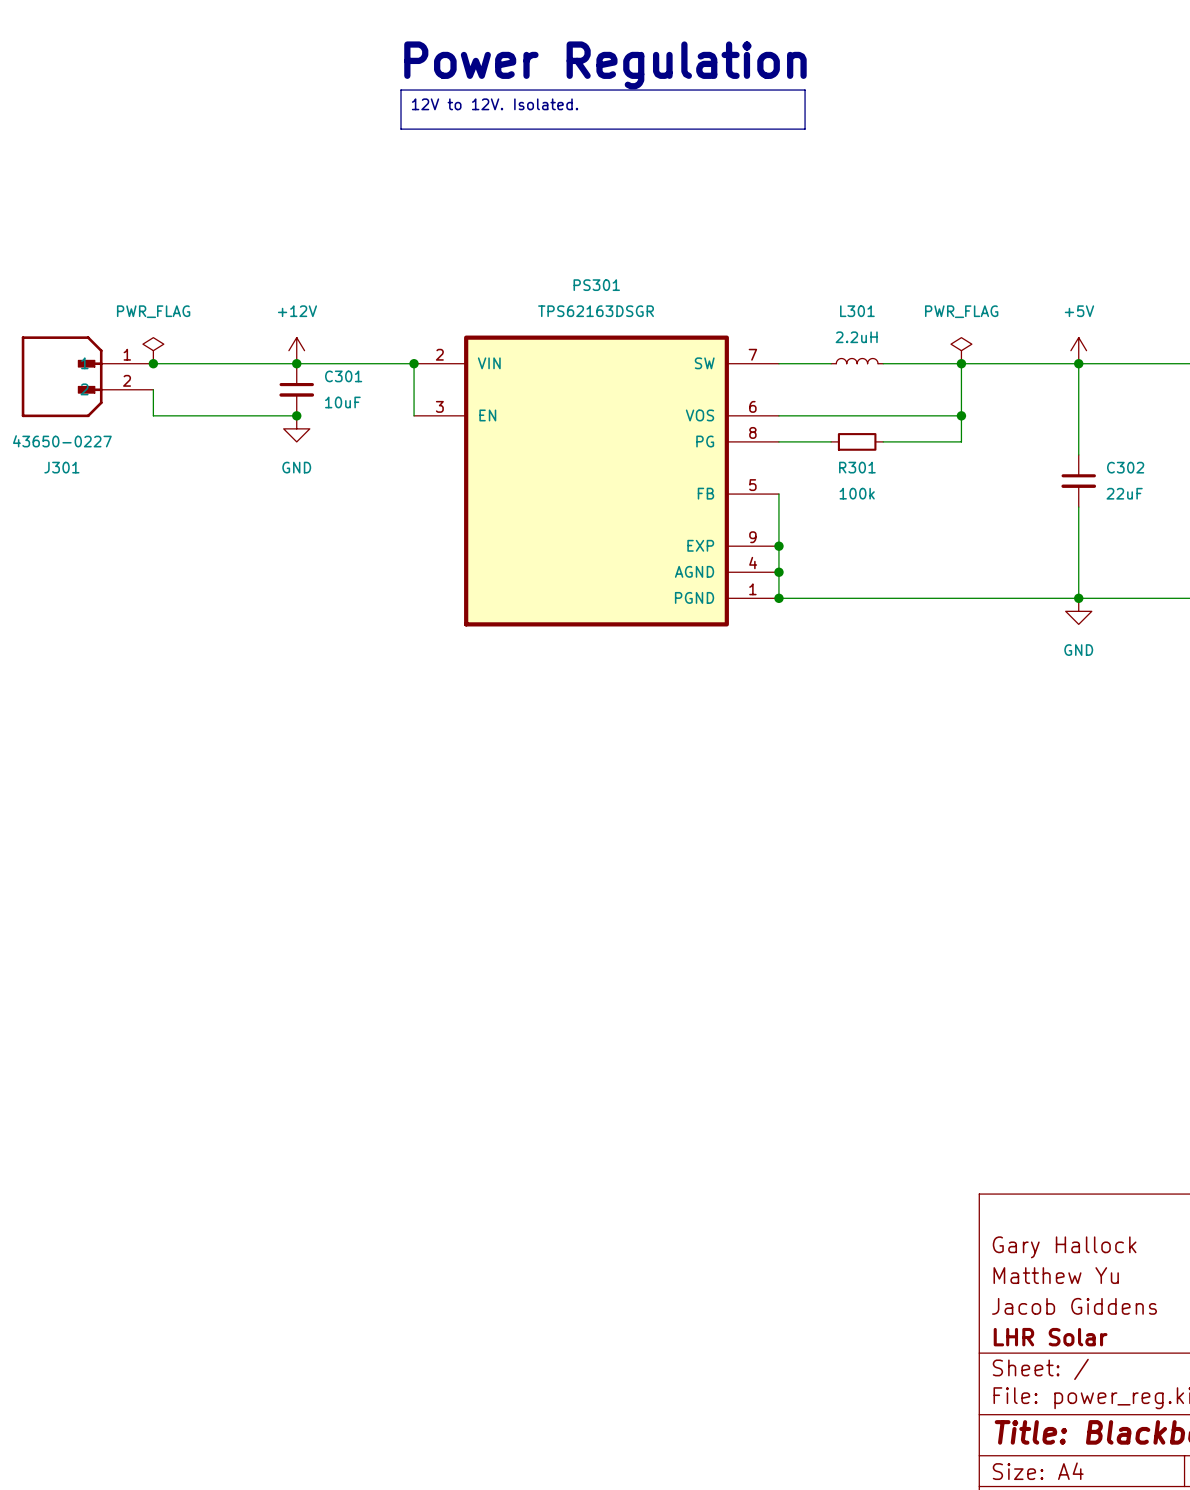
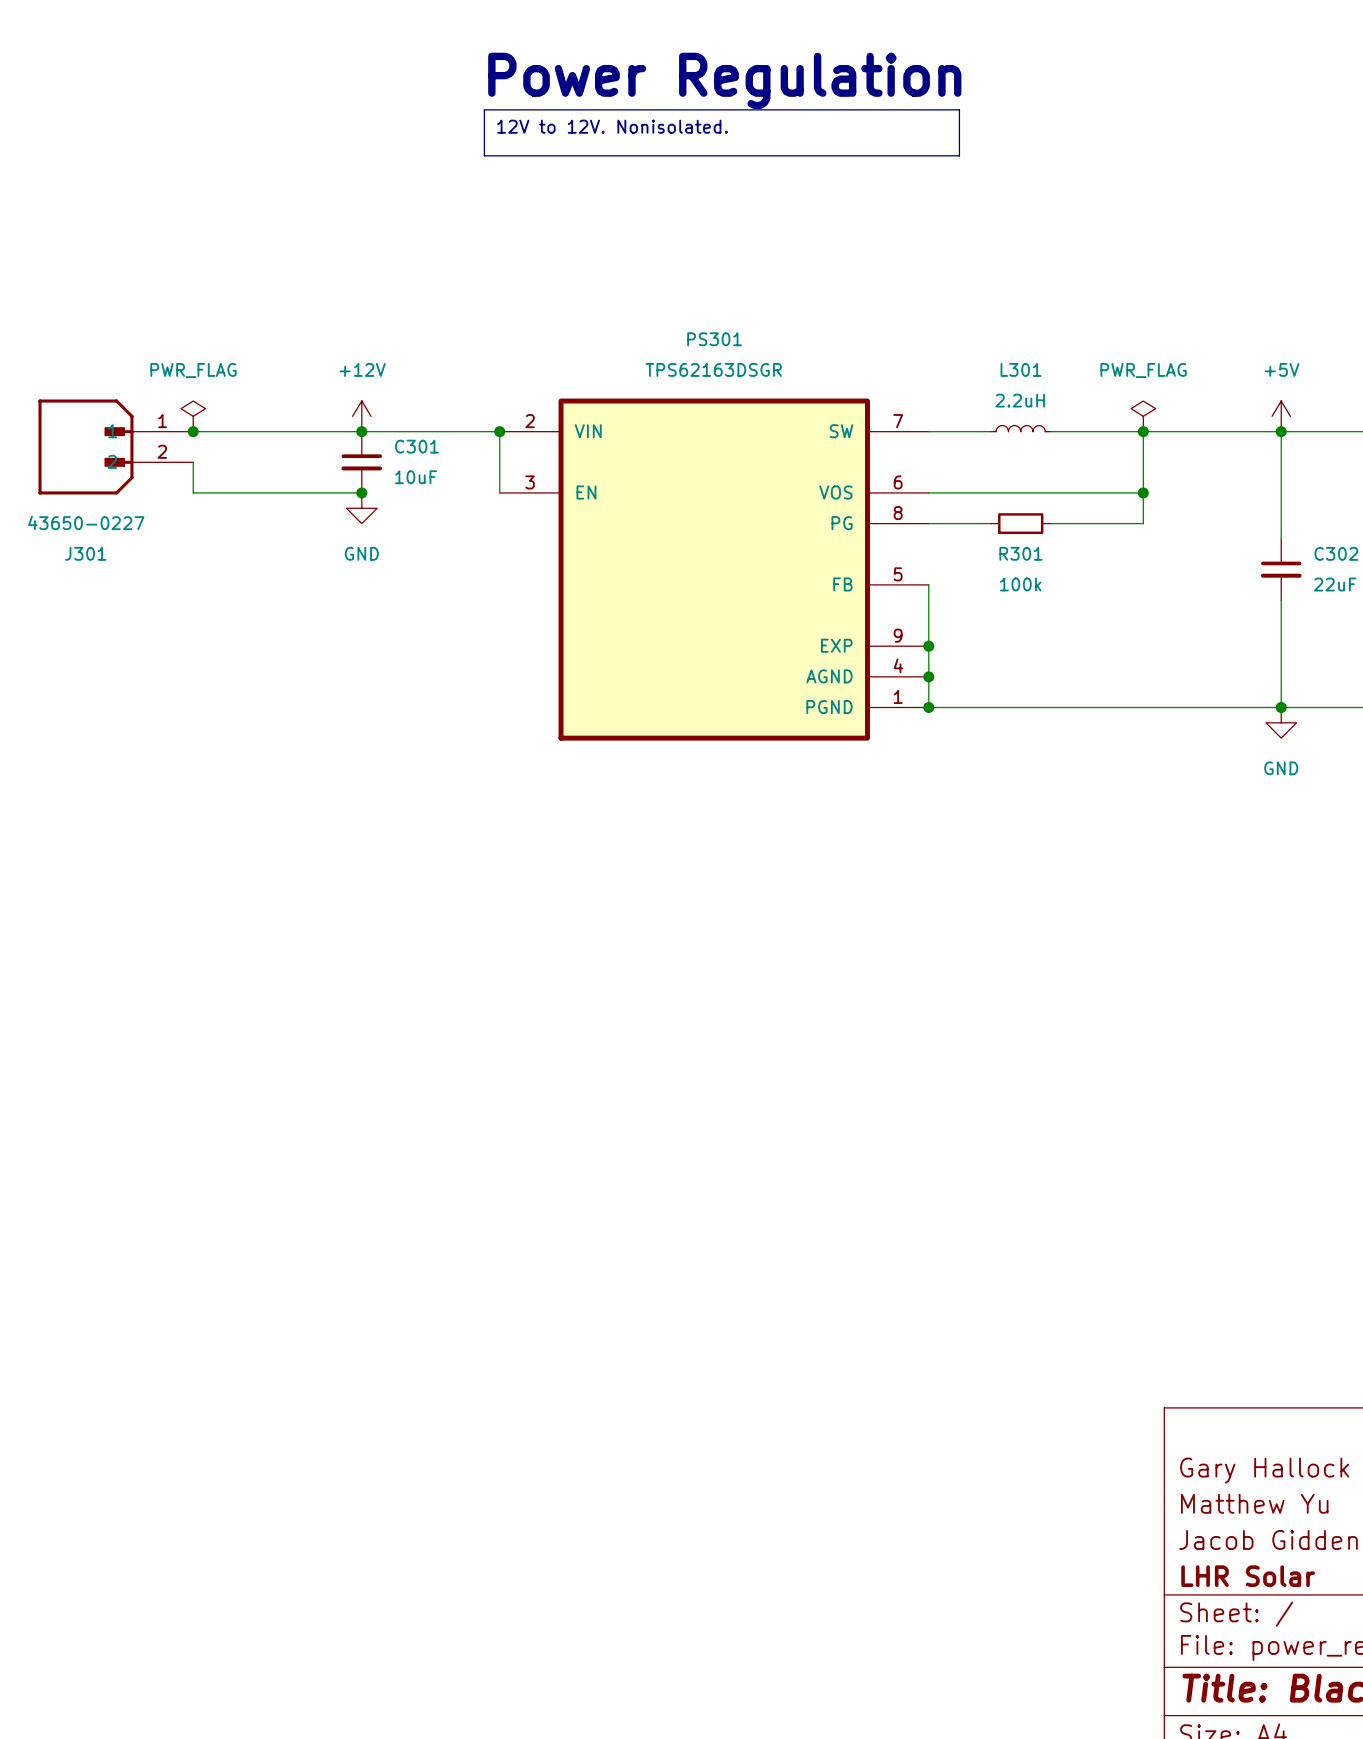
text: 12V to 12V. Isolated. (495, 104) -> 12V to 12V. Nonisolated. (612, 126)

